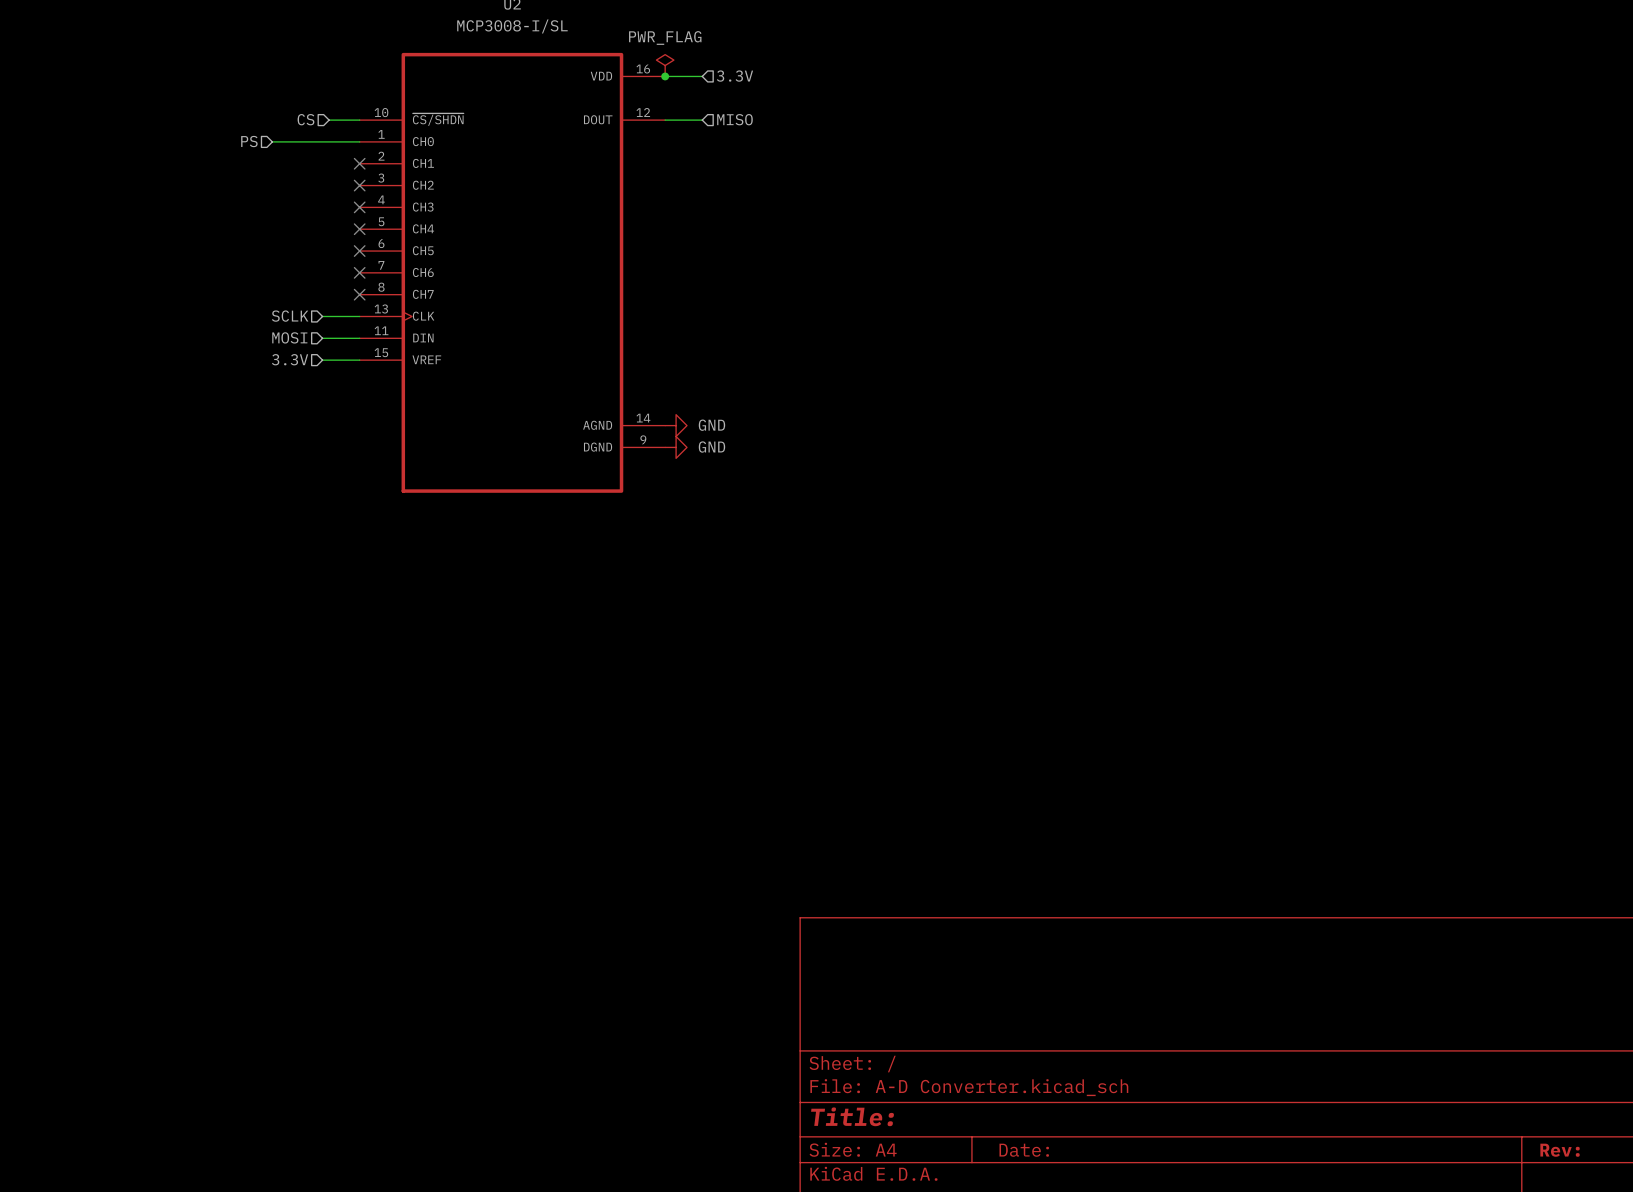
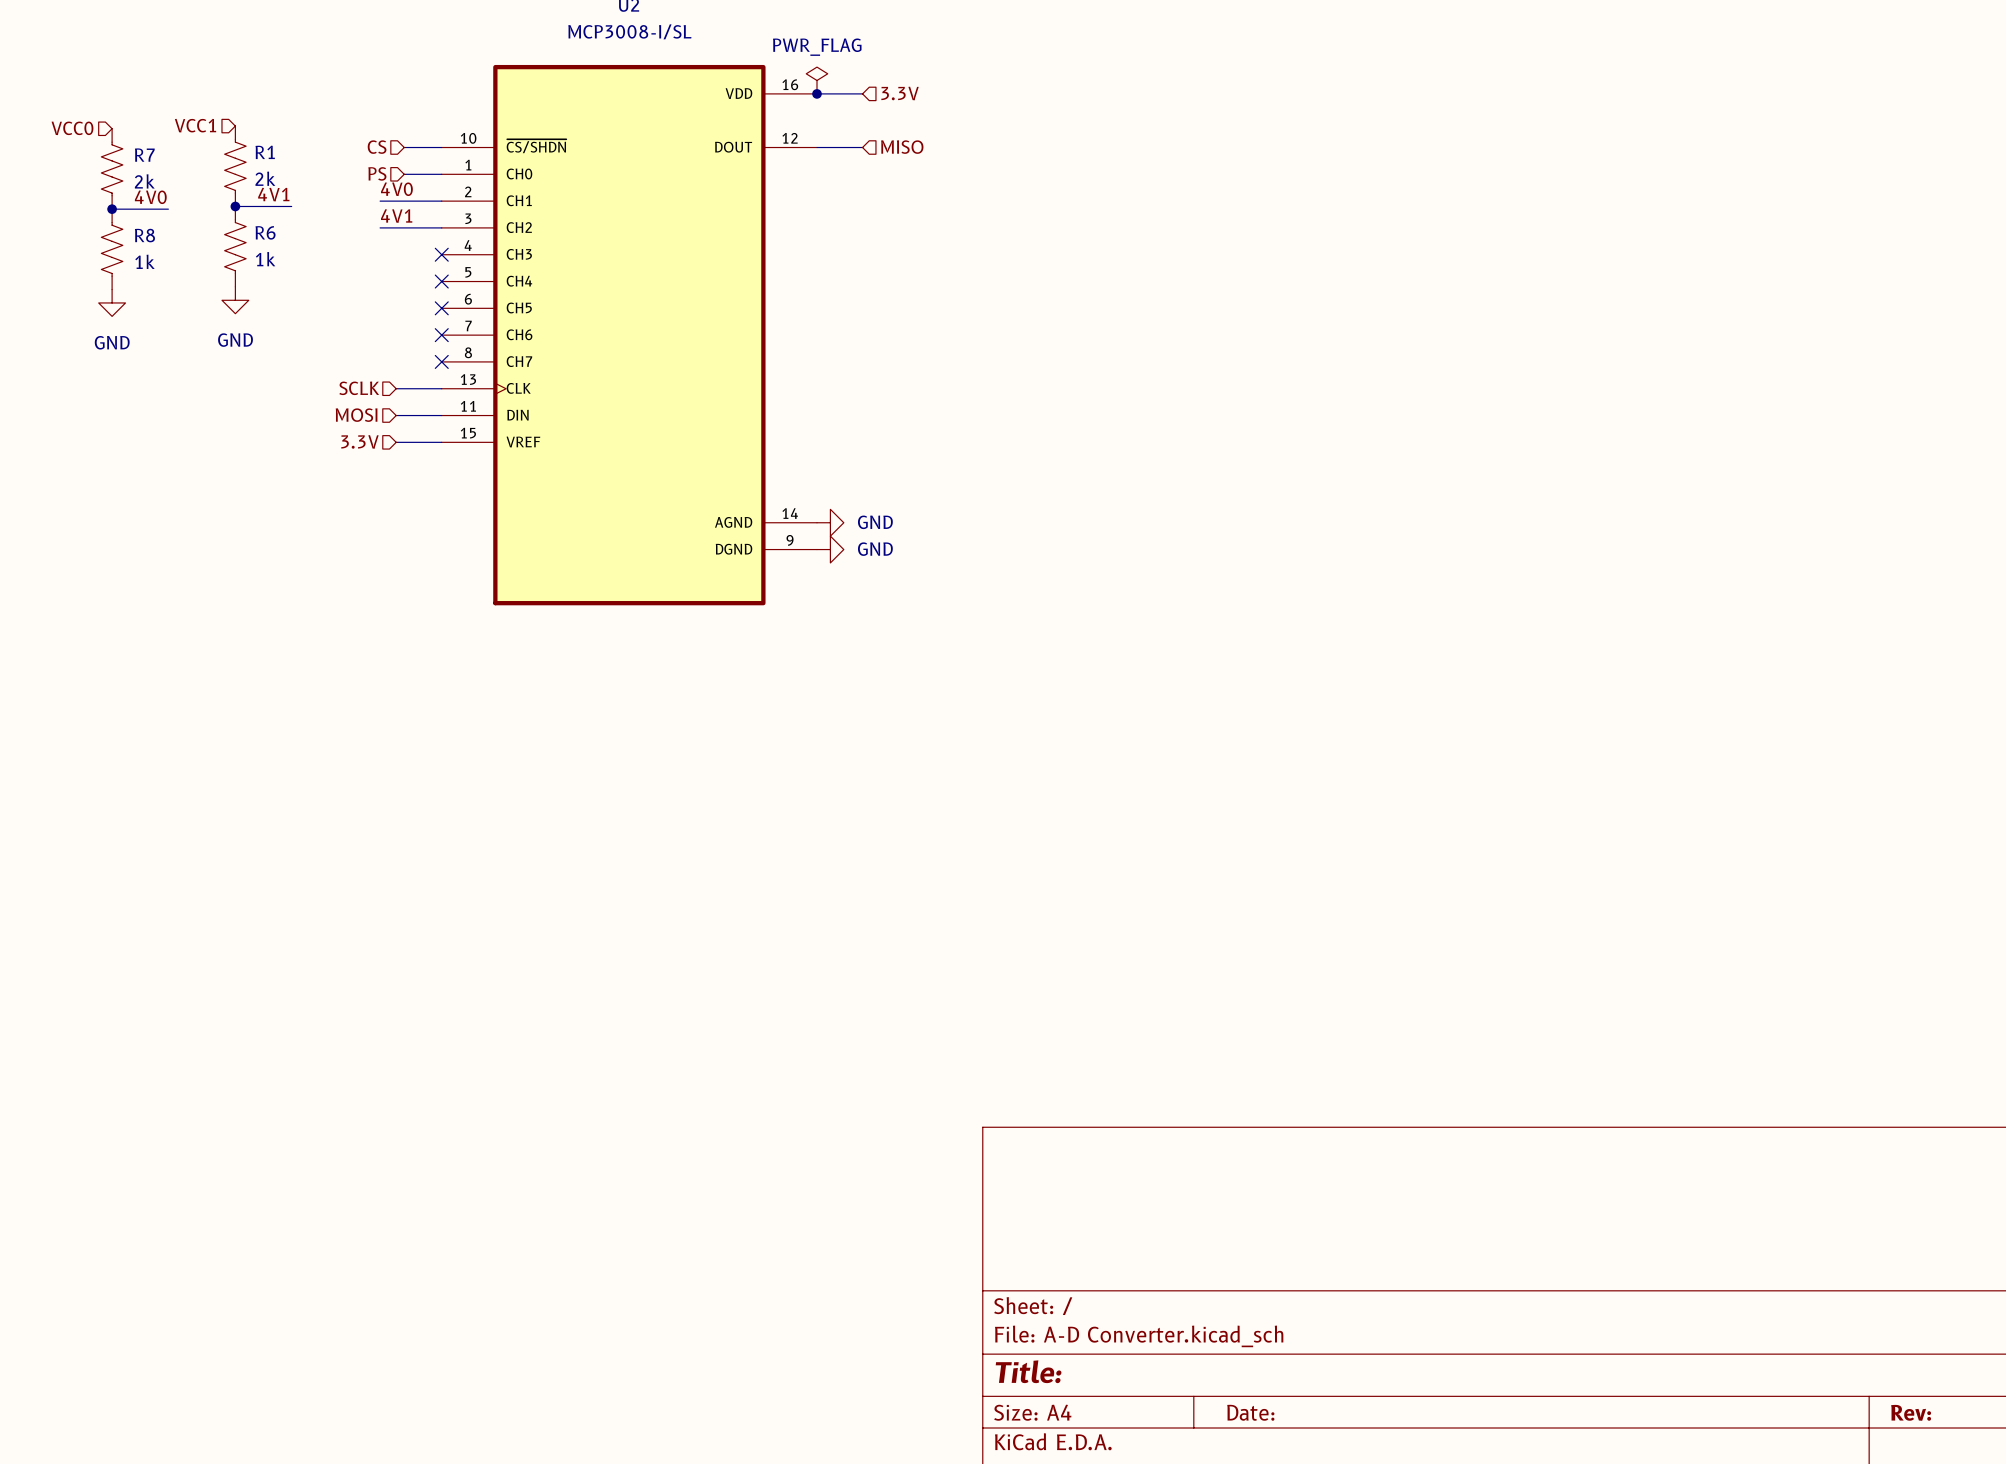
hierarchical label: none -> VCC1 (195, 125)
hierarchical label: none -> VCC0 (72, 128)
R1: none -> 2k (235, 166)
R7: none -> 2k (112, 168)
hierarchical label position: PS (249, 141) -> PS (377, 173)
wire: (272, 141) (329, 141) -> none
label: none -> 4V0 (396, 189)
label: none -> 4V1 (273, 194)
label: none -> 4V0 (150, 197)
wire: none -> (380, 201) (441, 201)
no-connect mark: (359, 163) -> none
wire: none -> (235, 206) (291, 206)
junction: none -> (235, 206)
wire: none -> (112, 209) (168, 209)
junction: none -> (112, 209)
label: none -> 4V1 (396, 216)
wire: none -> (380, 227) (441, 227)
no-connect mark: (359, 185) -> none
R6: none -> 1k (235, 246)
R8: none -> 1k (112, 249)
power symbol: none -> GND (235, 300)
power symbol: none -> GND (112, 302)

